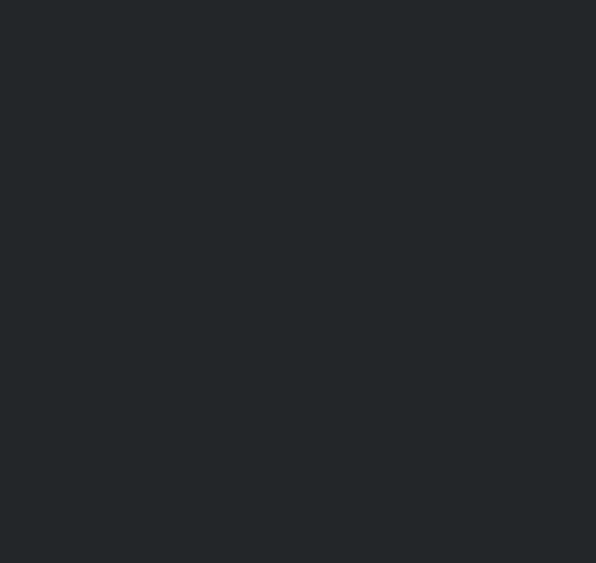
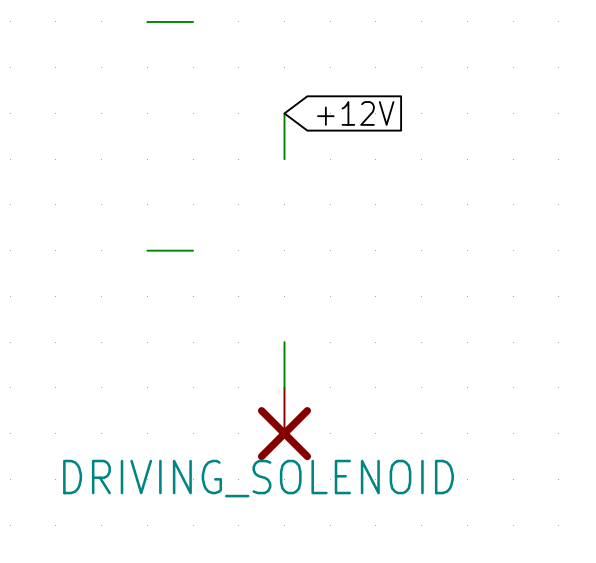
wire: none -> (147, 21) (193, 21)
wire: none -> (284, 113) (284, 159)
global label: none -> +12V (355, 113)
wire: none -> (147, 250) (193, 250)
wire: none -> (284, 342) (284, 387)
DRIVING_SOLENOID: none -> (284, 423)

